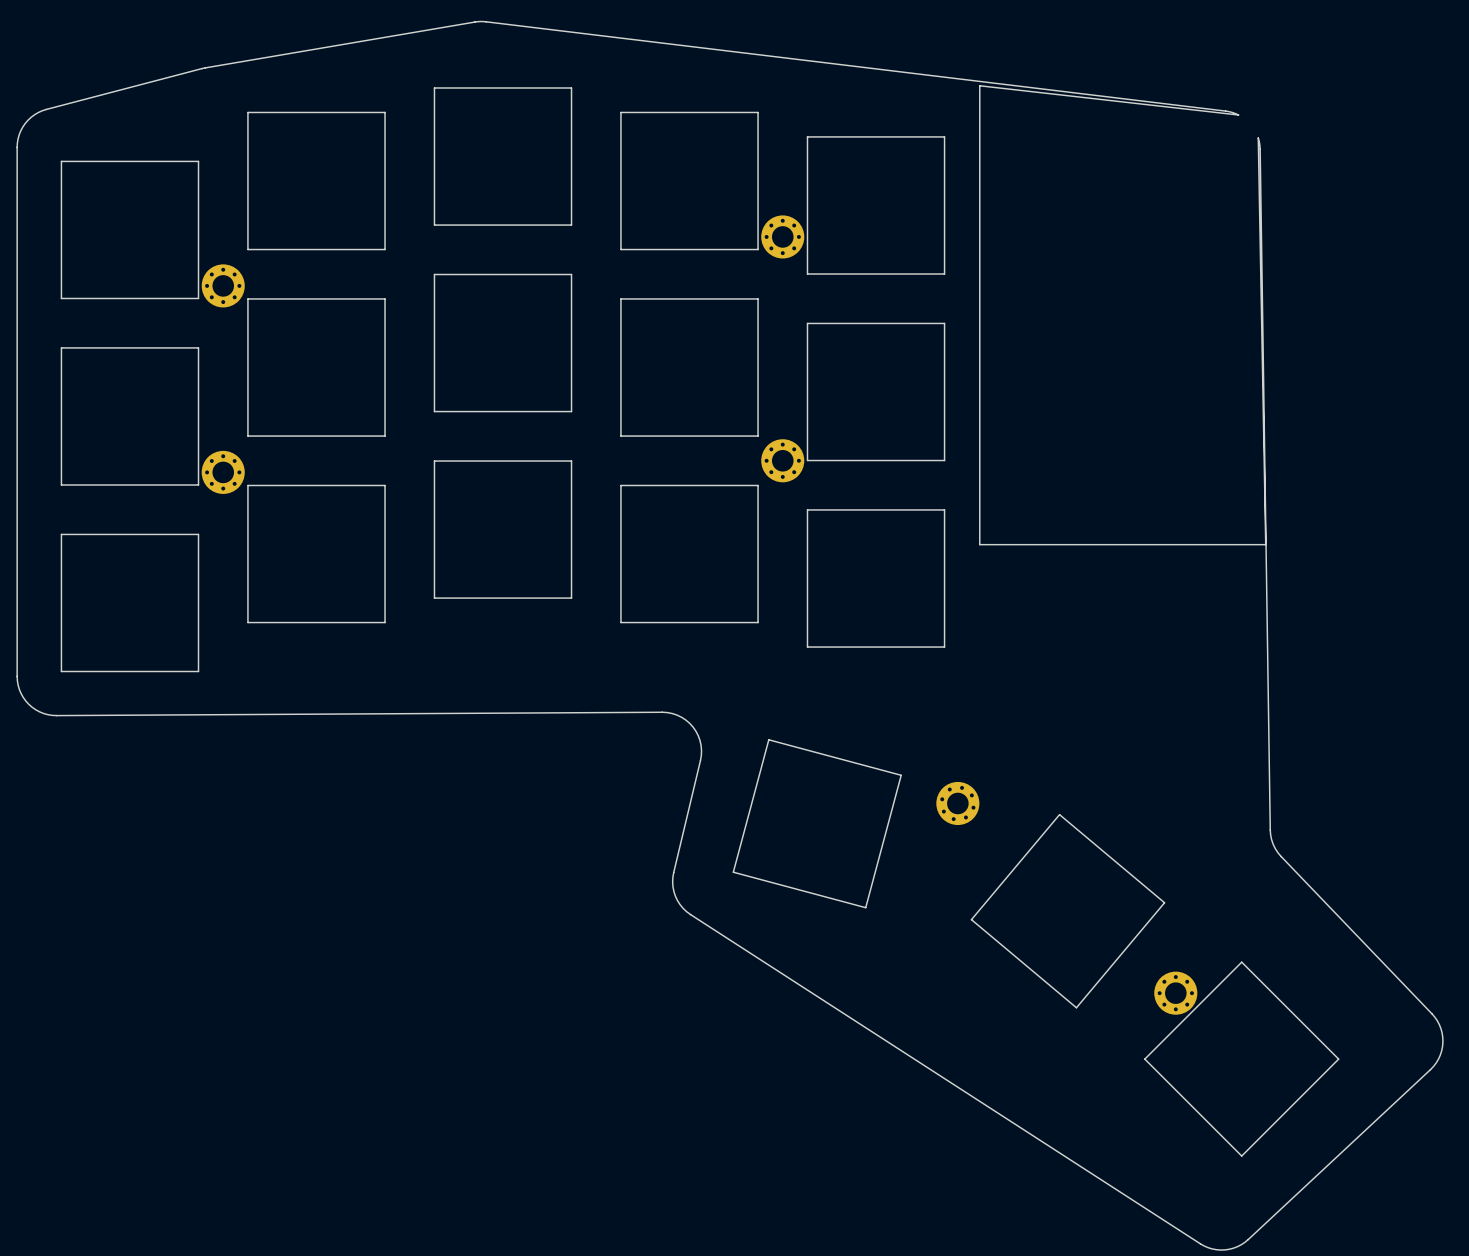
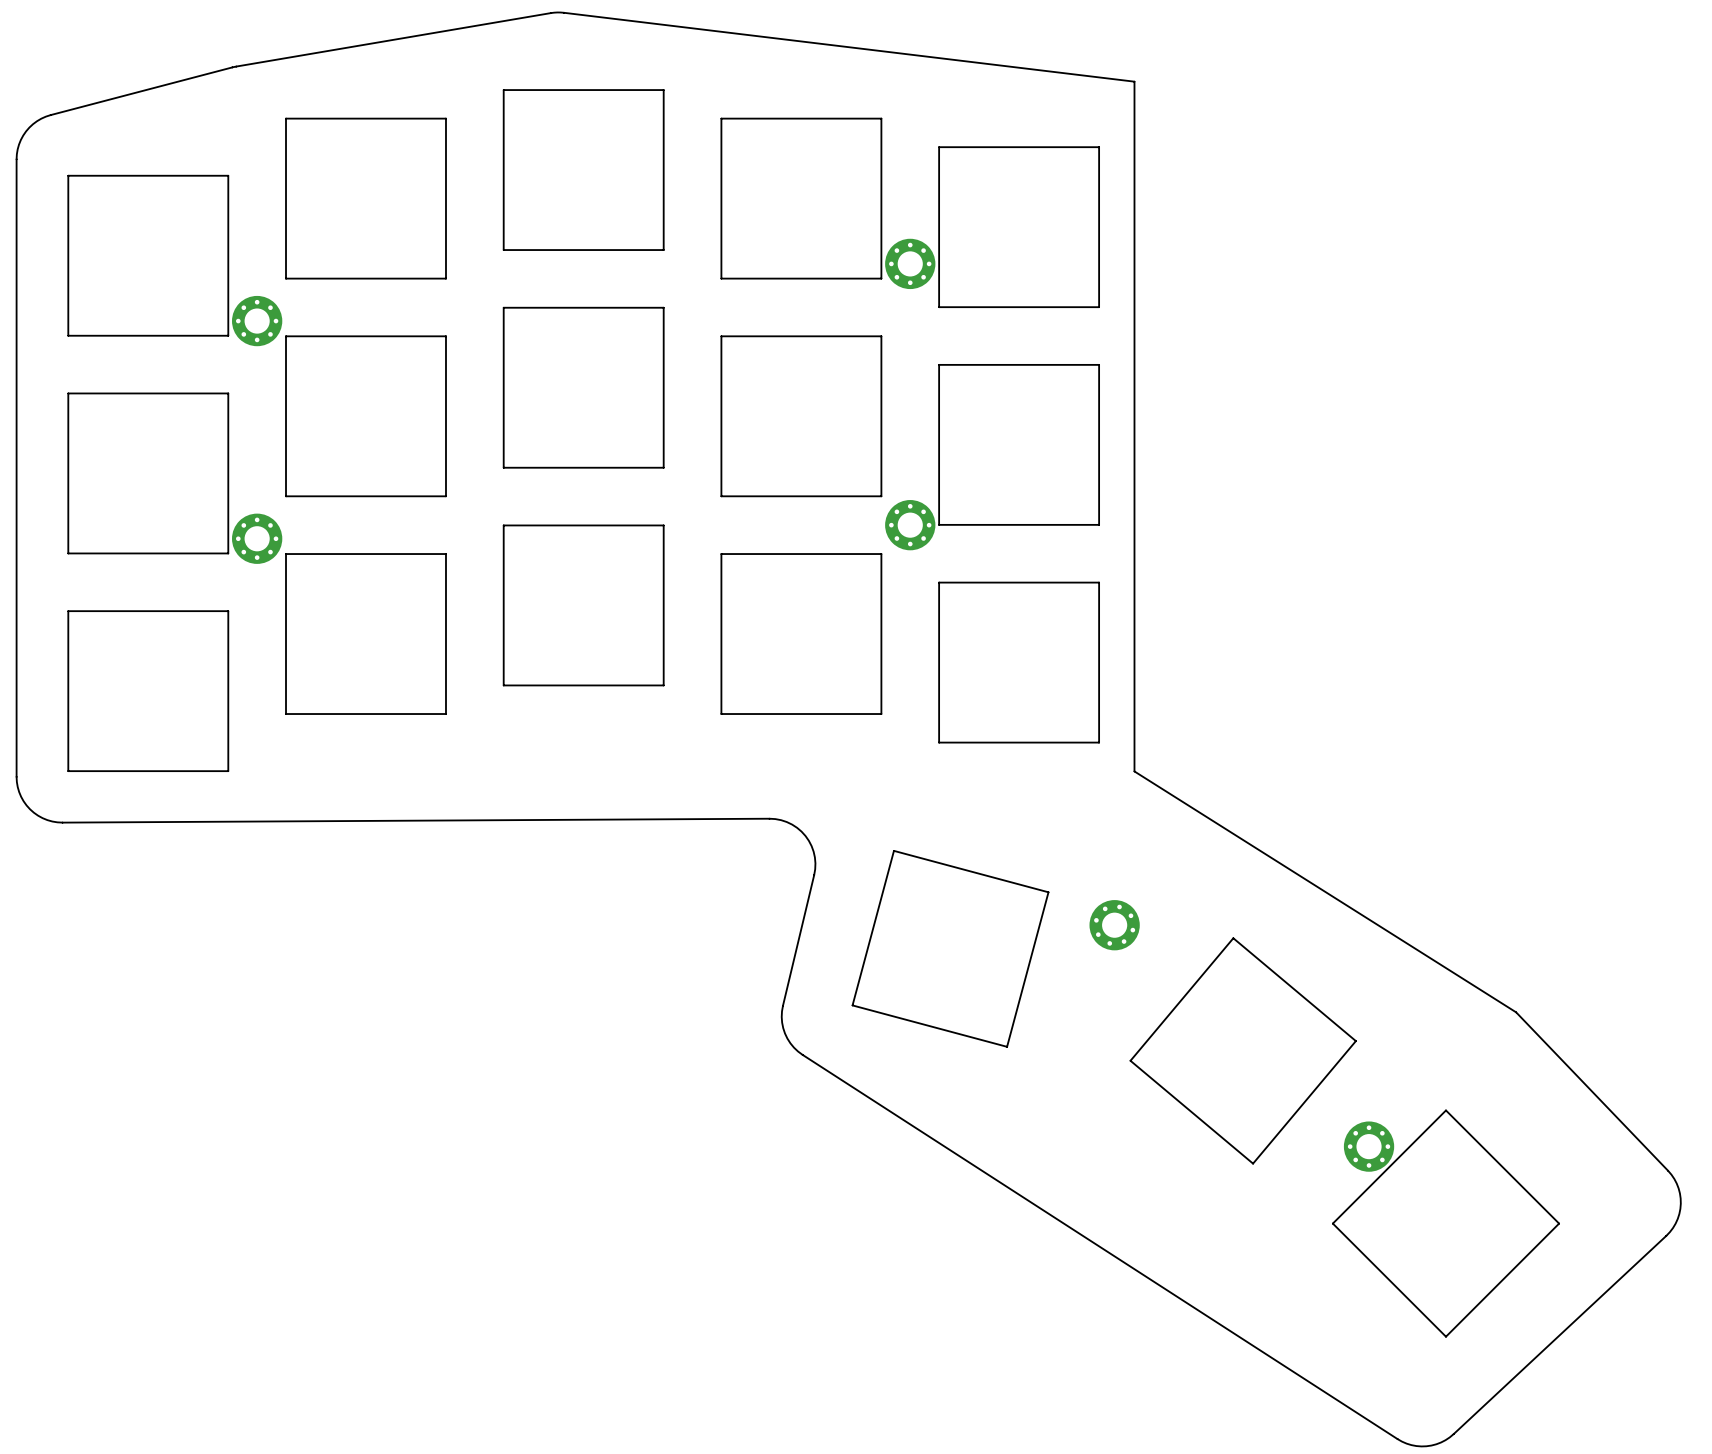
board edge: (974, 80) (1225, 111) (1238, 115) (979, 85) (979, 544) (1265, 544) (1258, 137) (1260, 149) (1270, 830) (1271, 839) (1278, 852) (1301, 878) -> (1134, 81) (1134, 771) (1516, 1012)

